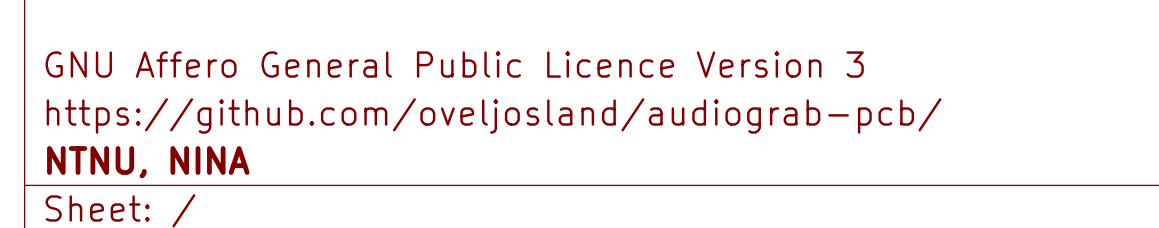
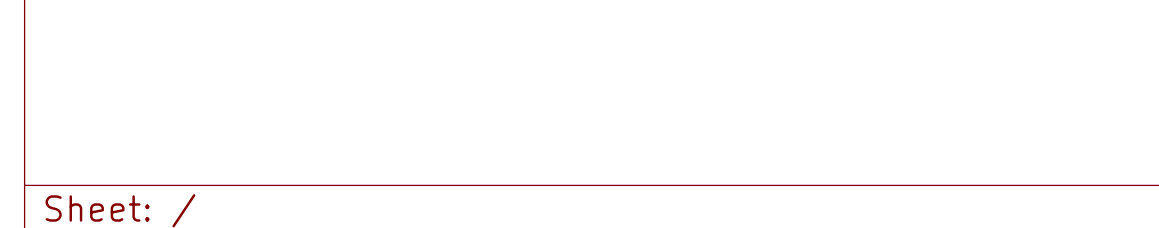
title block: GNU Affero General Public Licence Version 3 (454, 64) -> none
title block: https://github.com/oveljosland/audiograb-pcb/ (494, 115) -> none
title block: NTNU, NINA (148, 162) -> none

